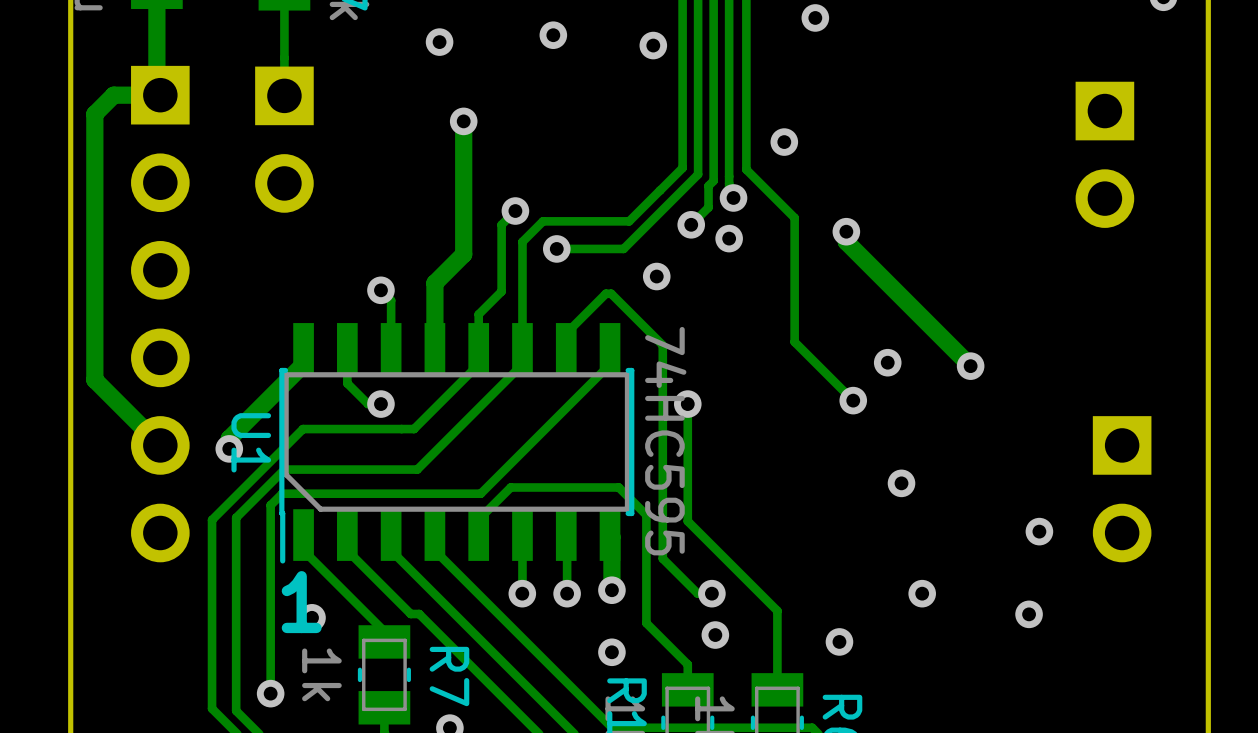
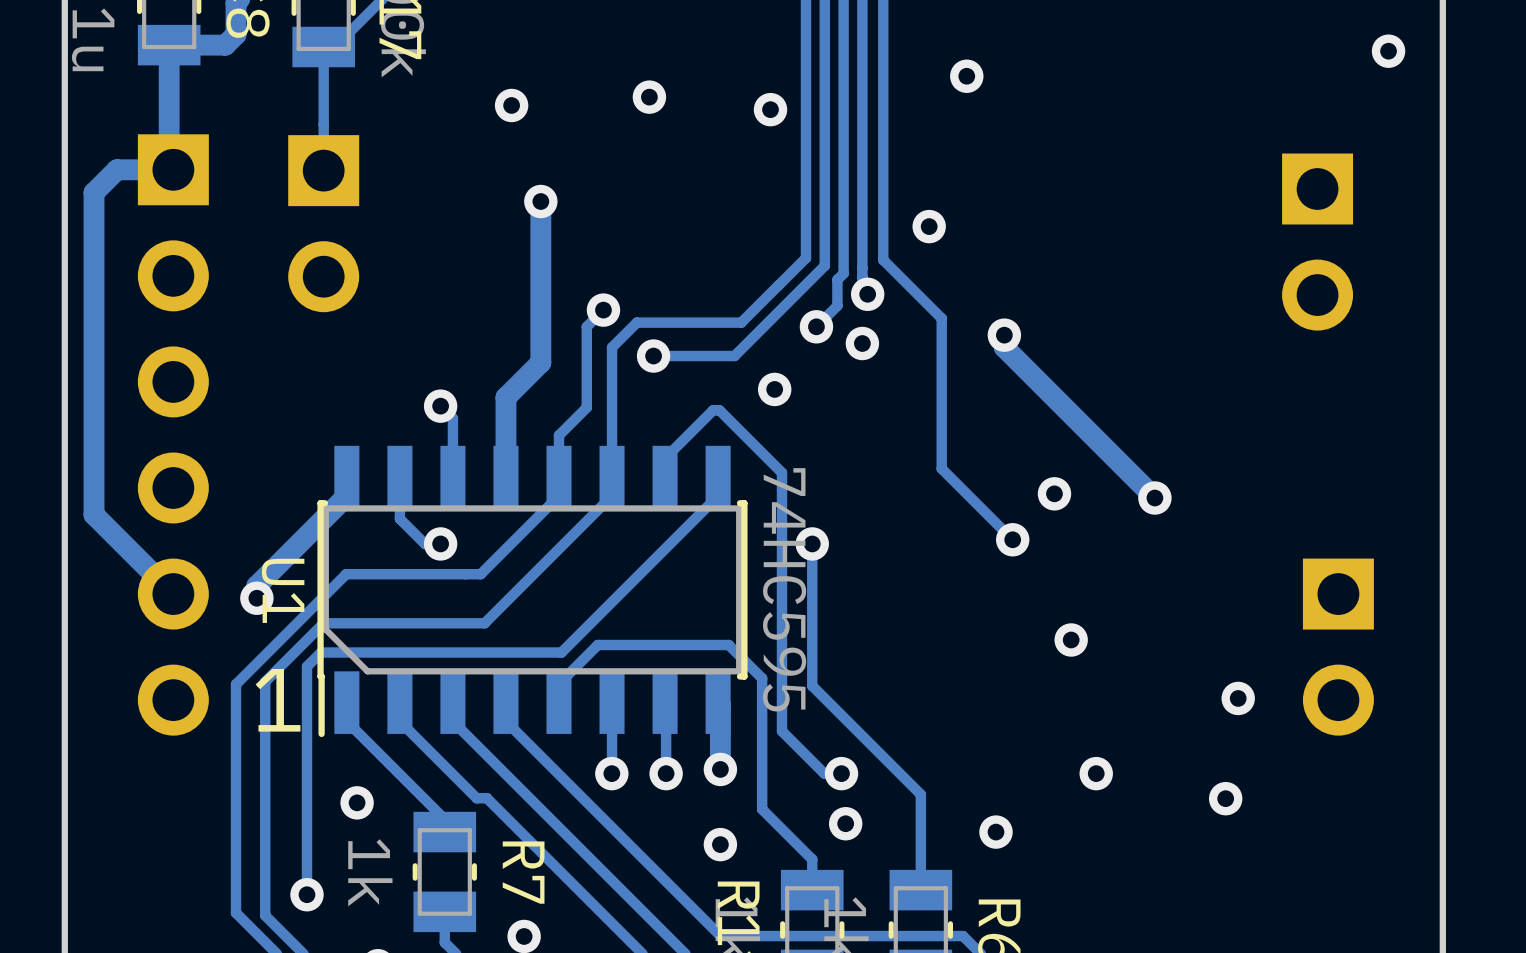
text position: 1 (301, 602) -> 1 (278, 700)

